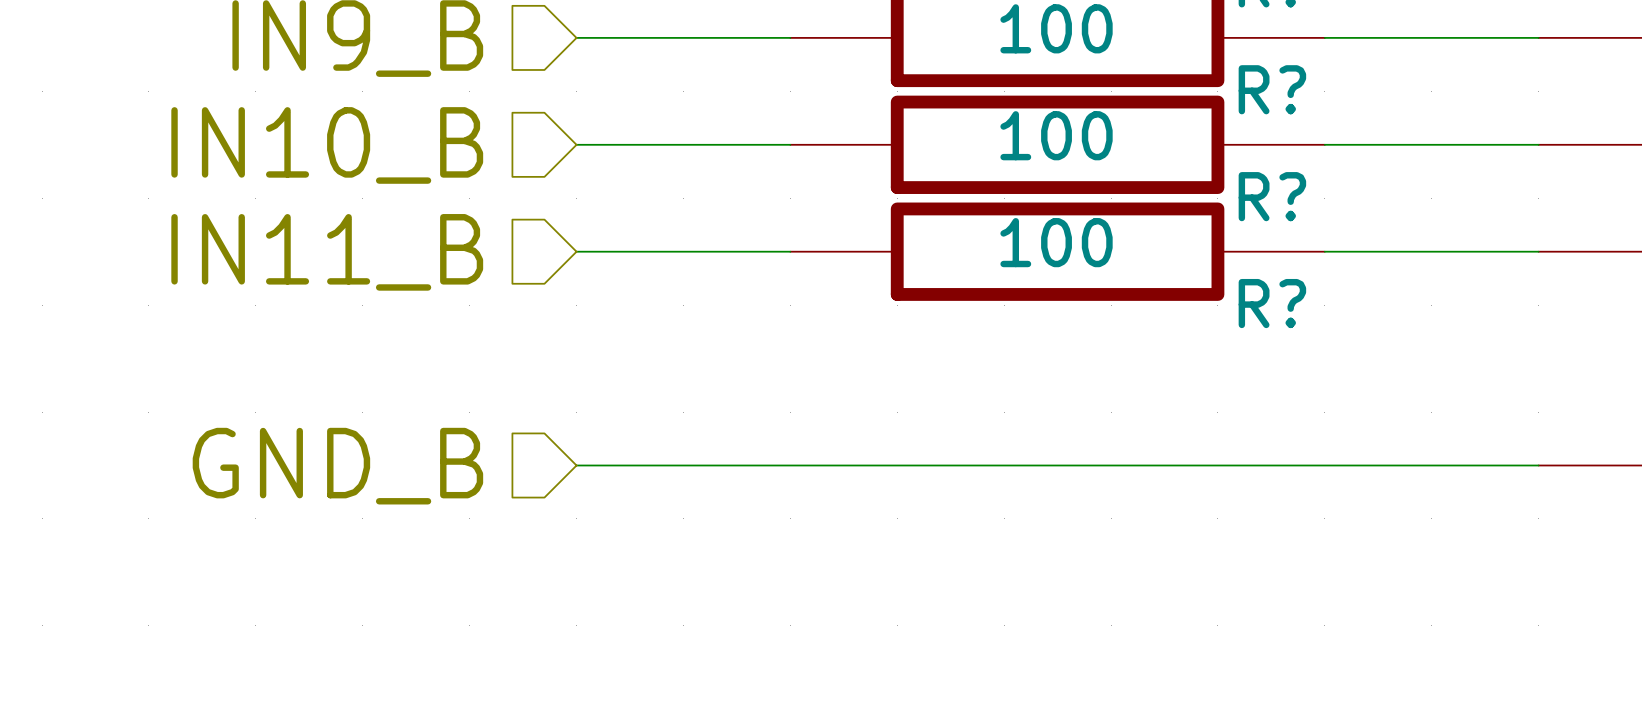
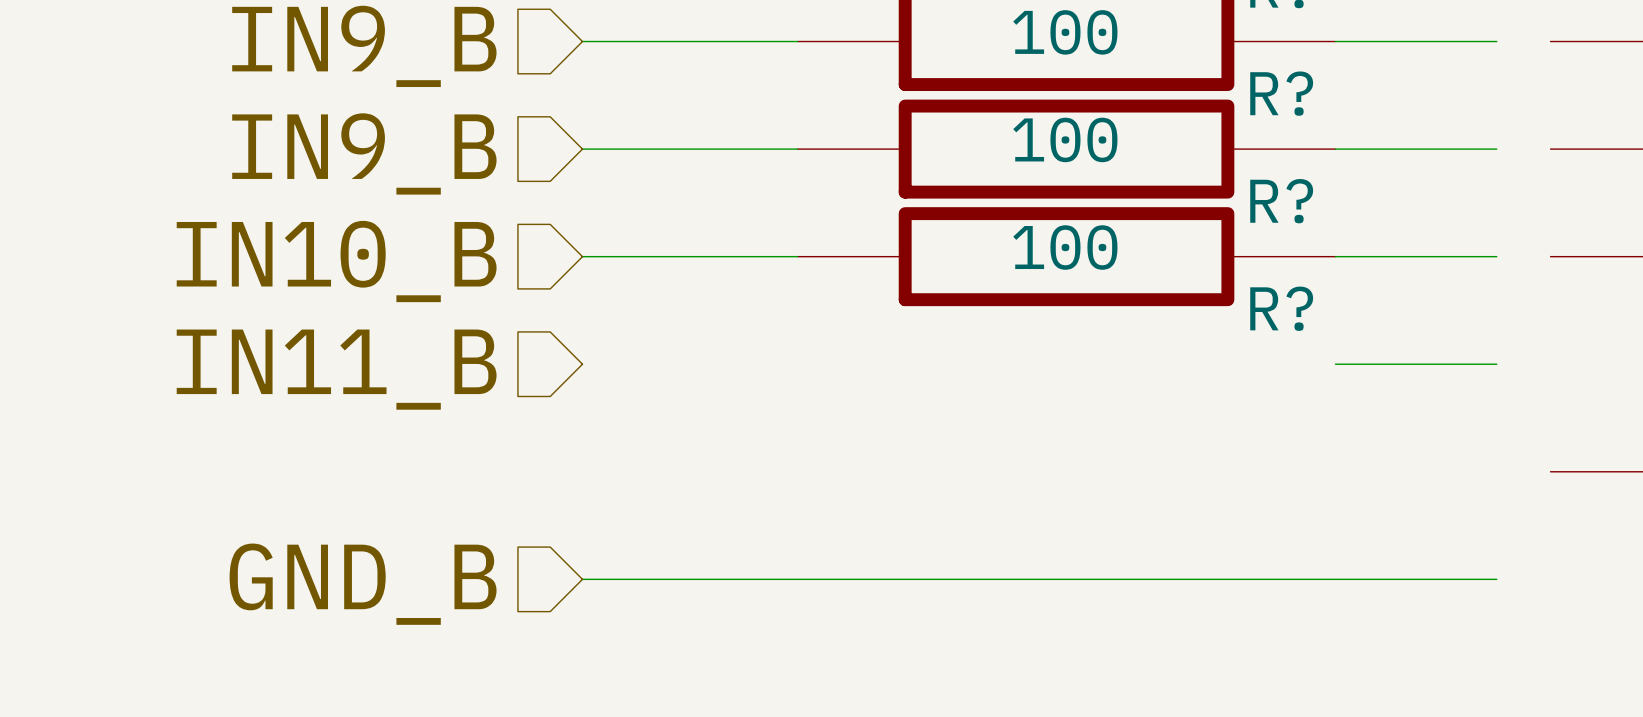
wire: (1485, 37) (1538, 37) -> none
wire: (1485, 144) (1538, 144) -> none
hierarchical label: IN10_B (327, 145) -> IN9_B (364, 153)
wire: (1485, 251) (1538, 251) -> none
hierarchical label: IN11_B (327, 252) -> IN10_B (336, 261)
wire: none -> (1335, 364) (1496, 364)
hierarchical label: none -> IN11_B (336, 369)
wire: (576, 465) (1538, 465) -> none
hierarchical label position: GND_B (337, 466) -> GND_B (363, 584)
wire: none -> (582, 579) (1496, 579)

